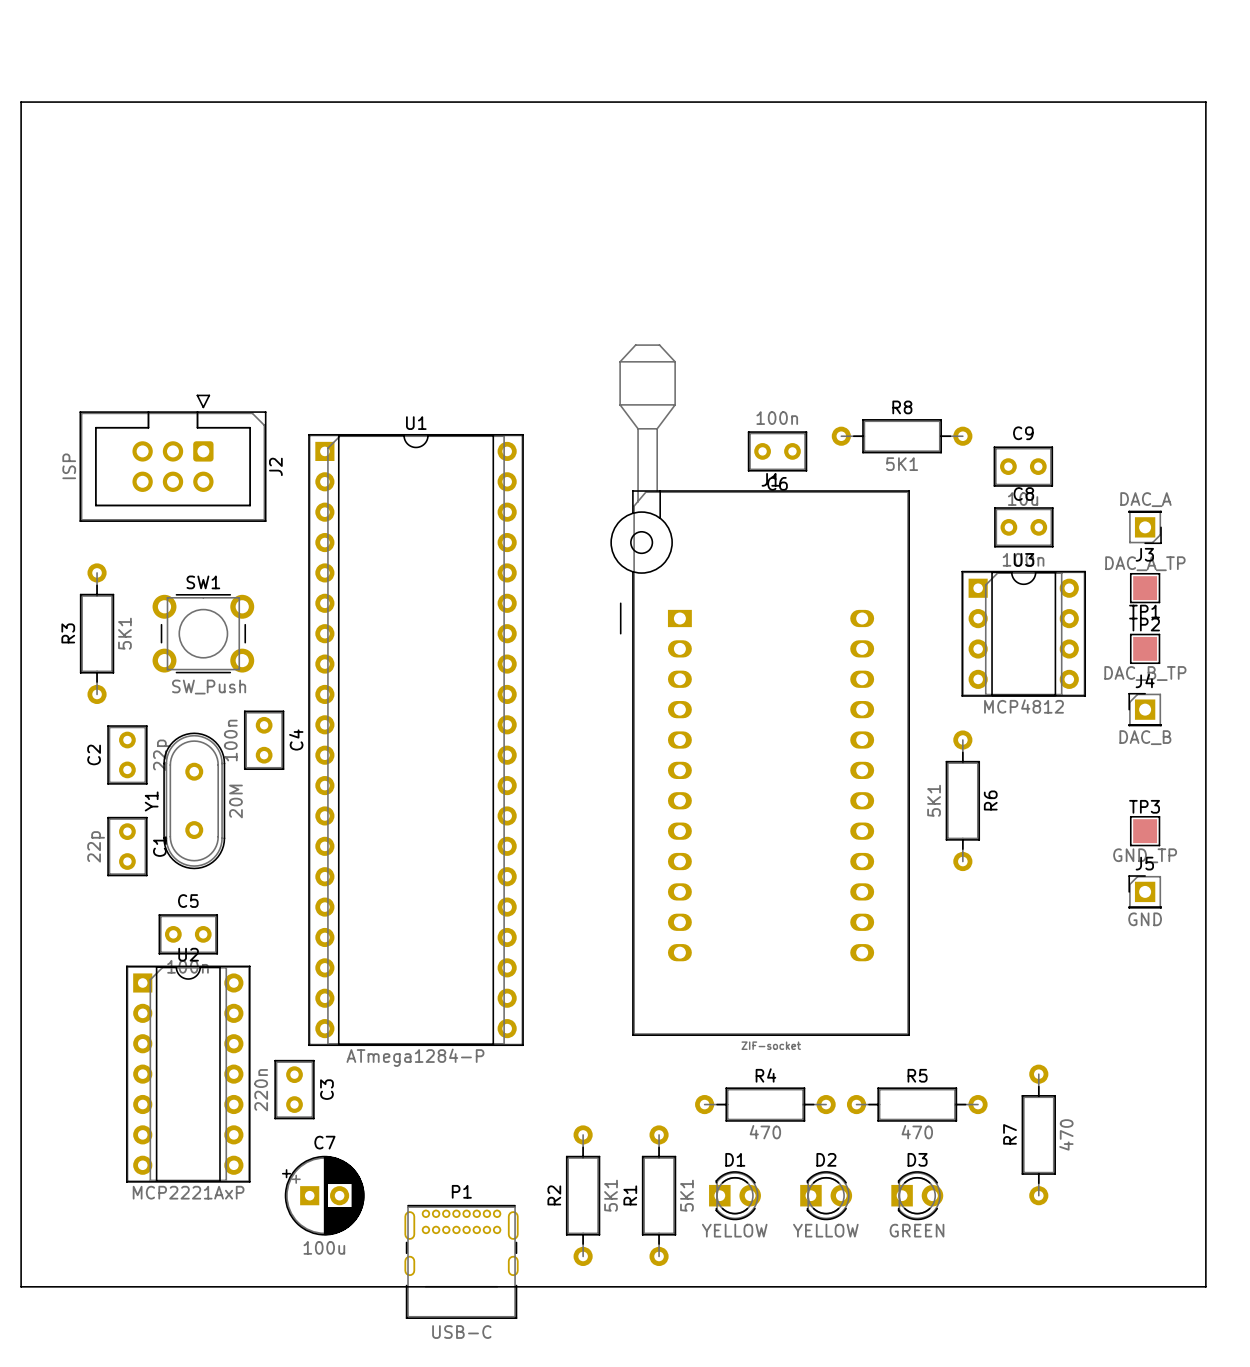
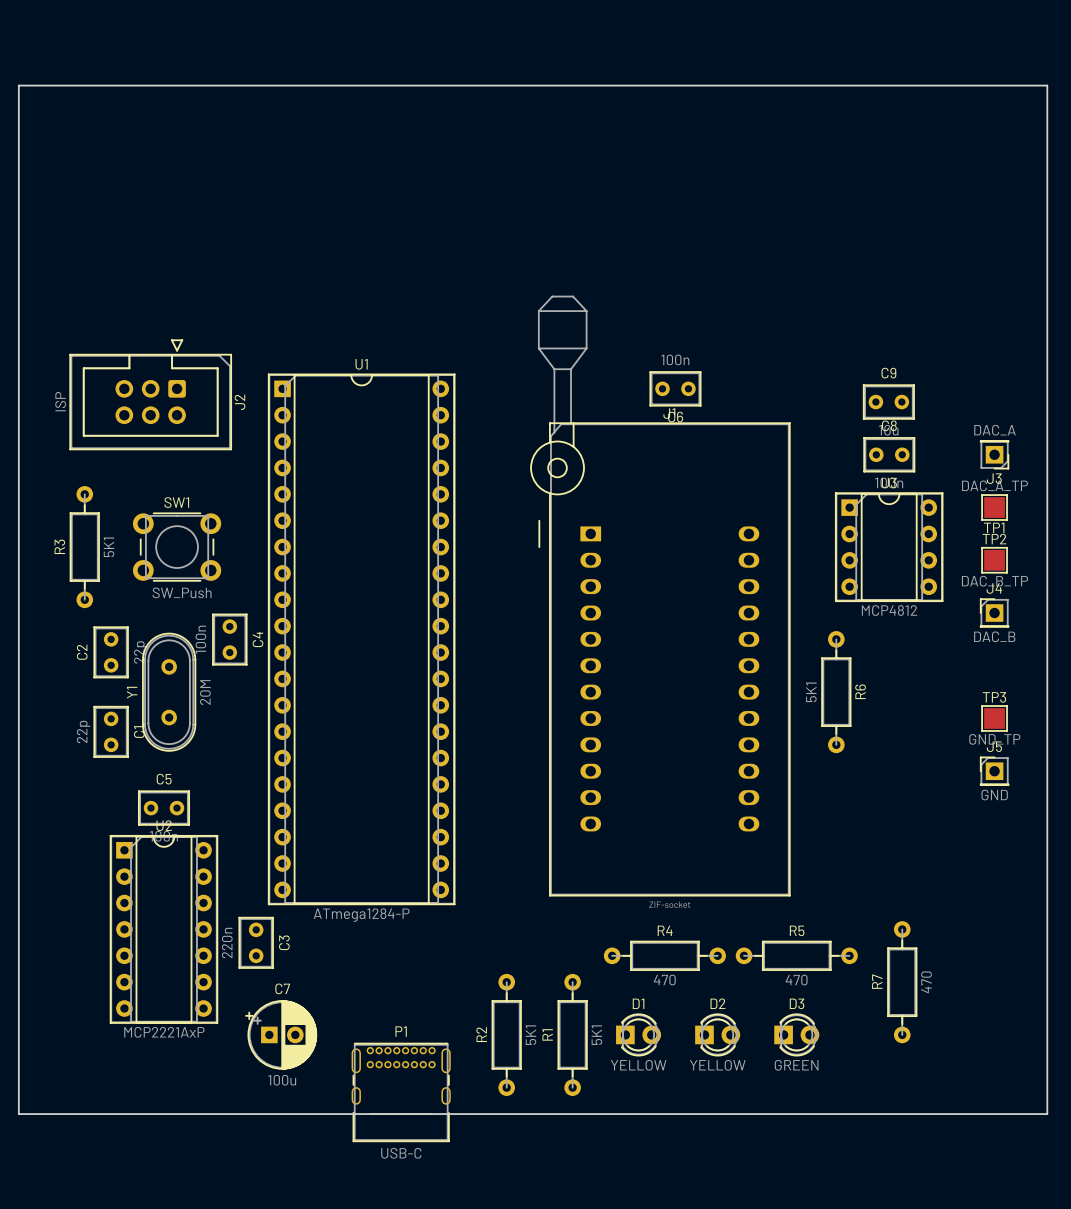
R8: 5K1 (902, 436) -> none

